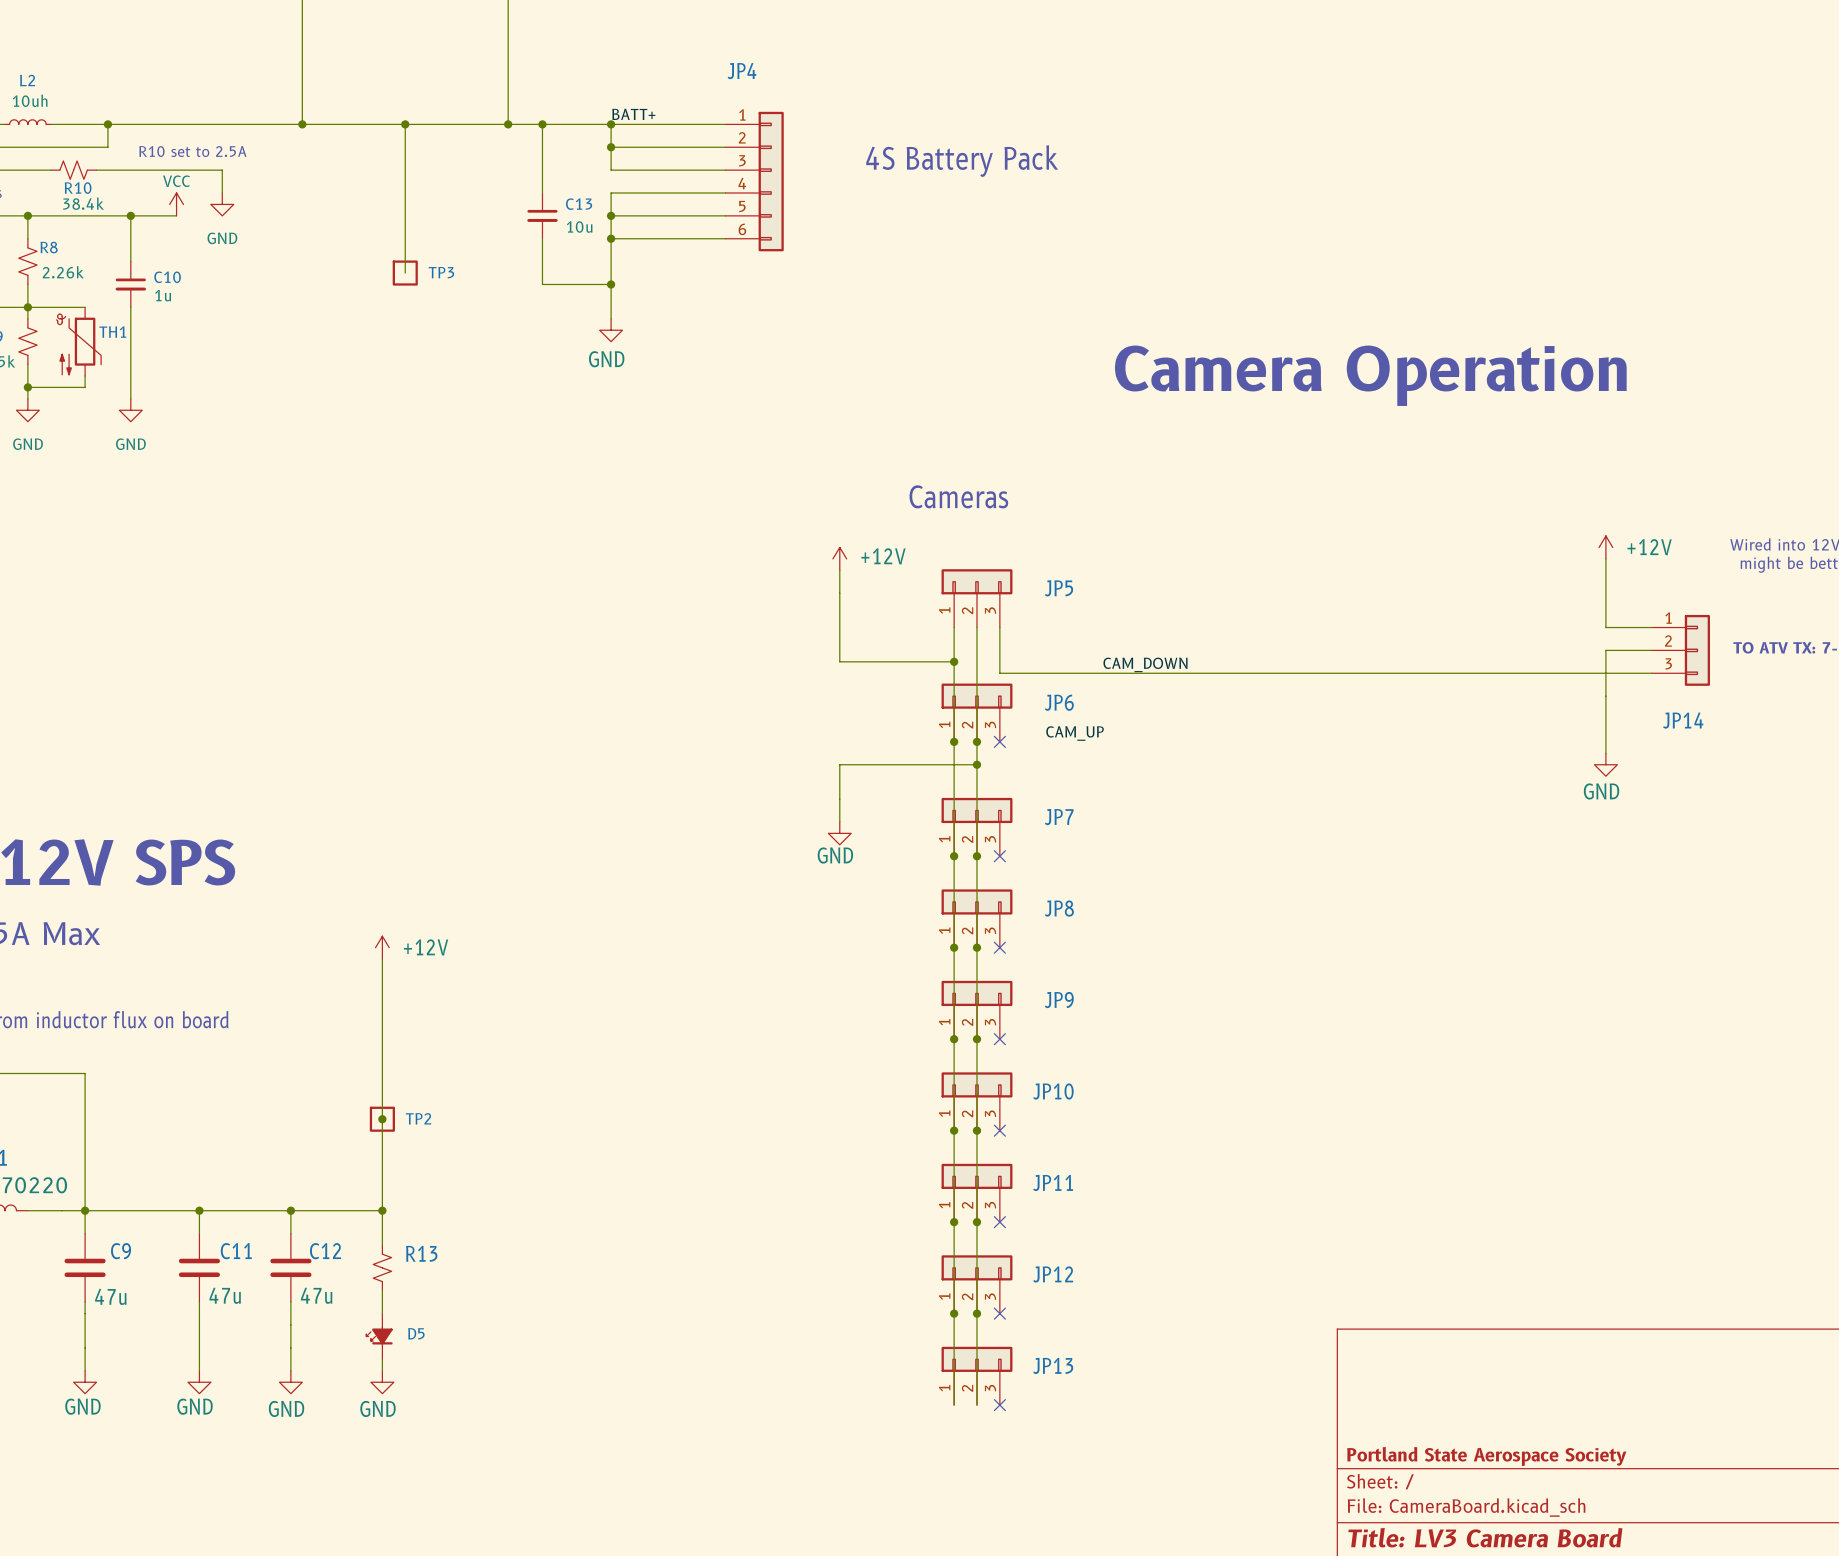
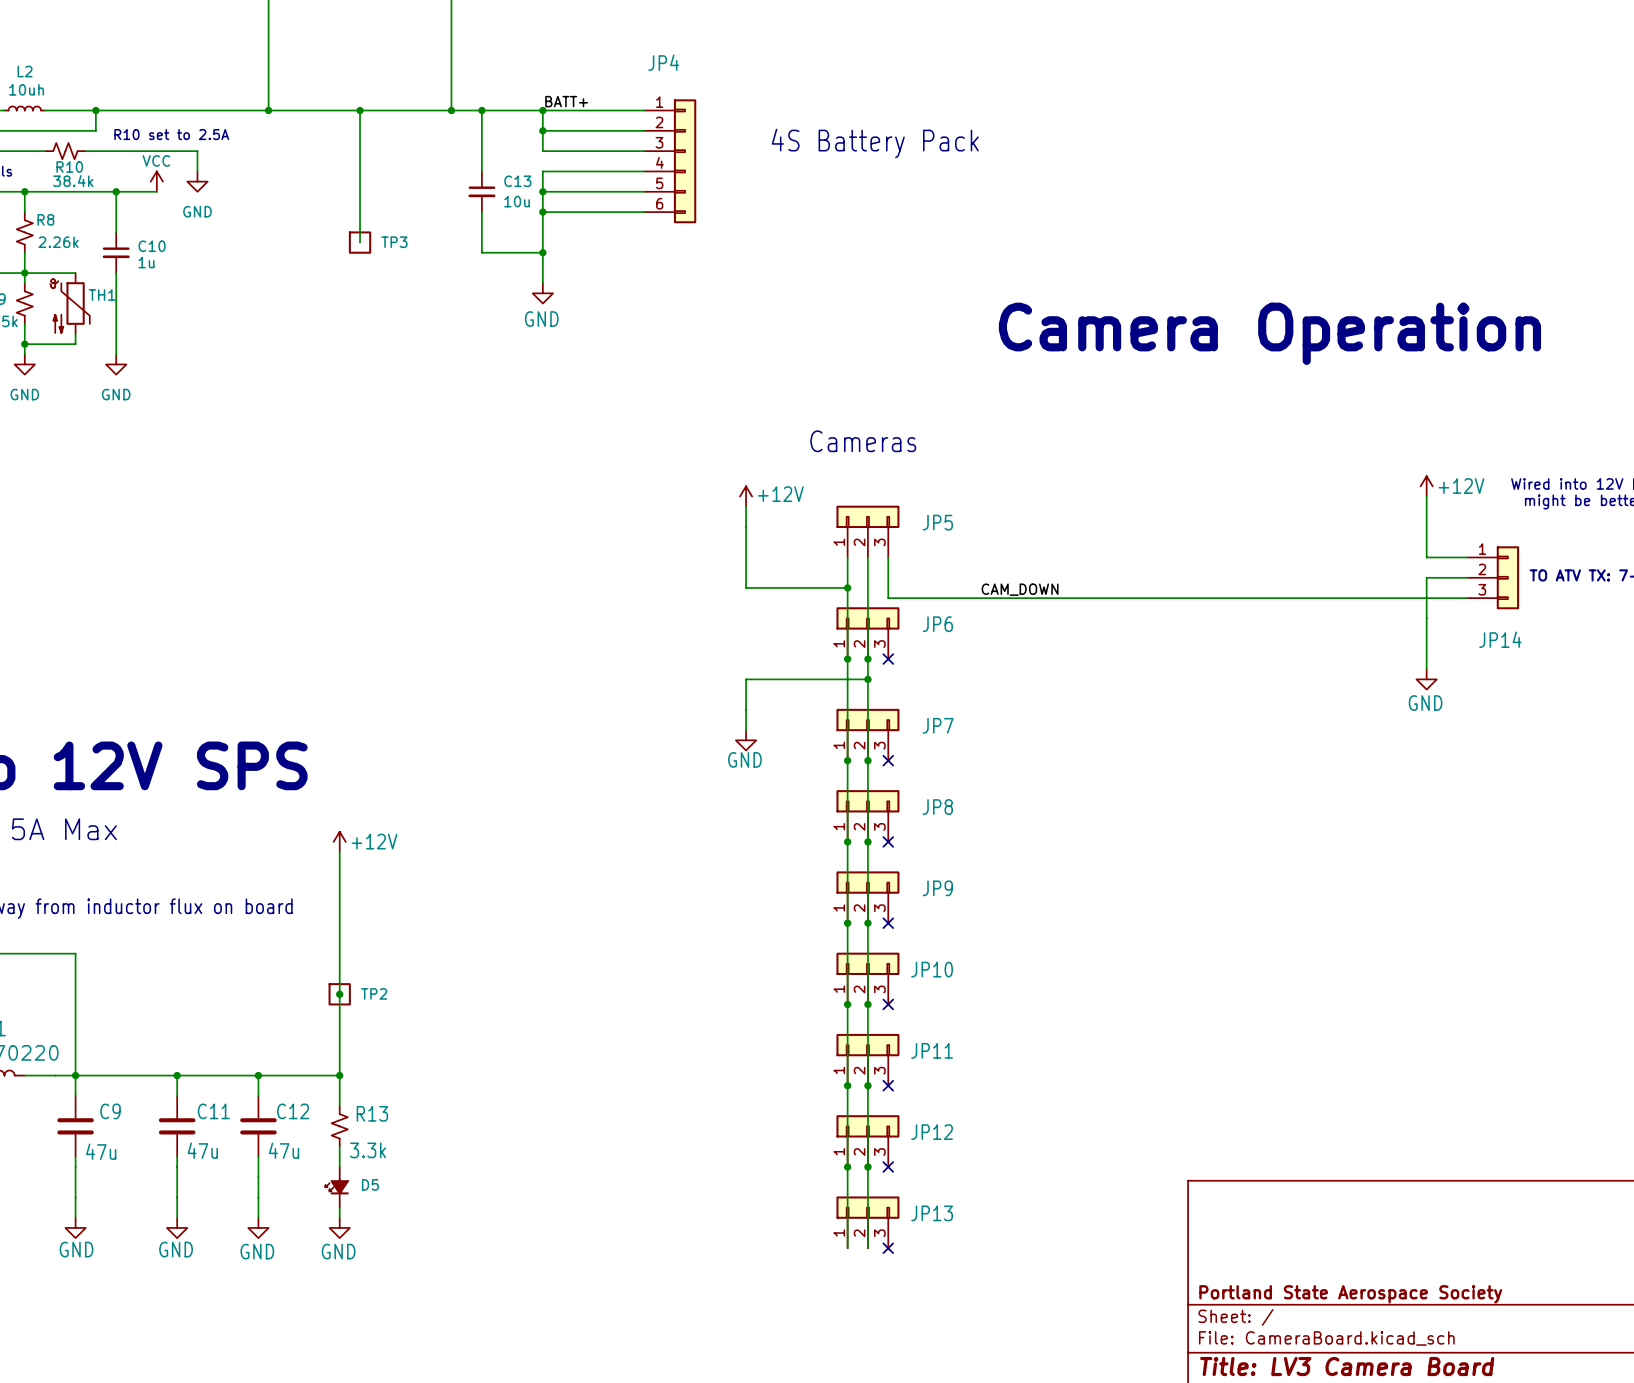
label: CAM_UP (1075, 733) -> none
R13 value: none -> 3.3k (368, 1150)

